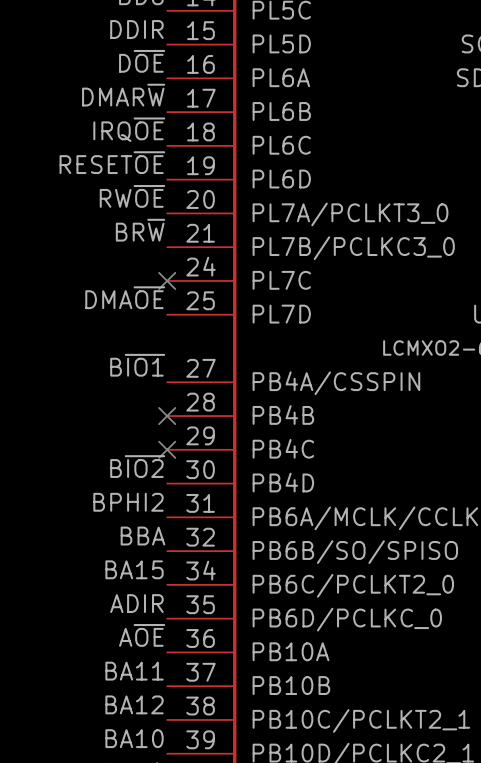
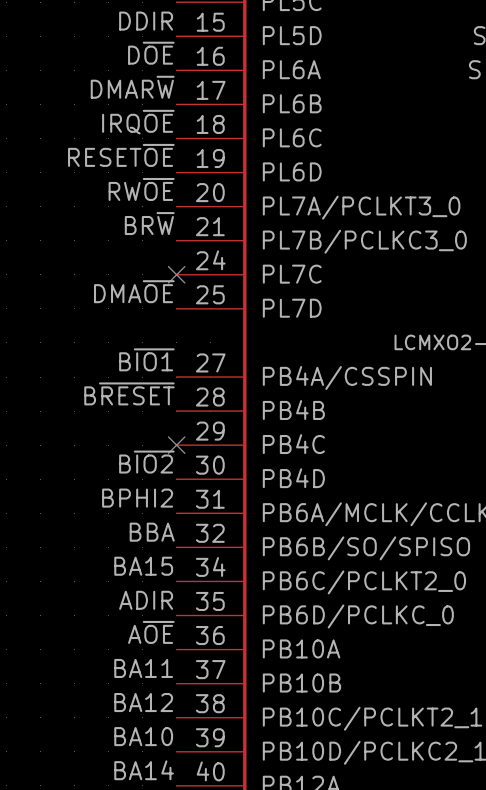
label: none -> B~{RESET} (129, 393)
no-connect mark: (167, 416) -> none

